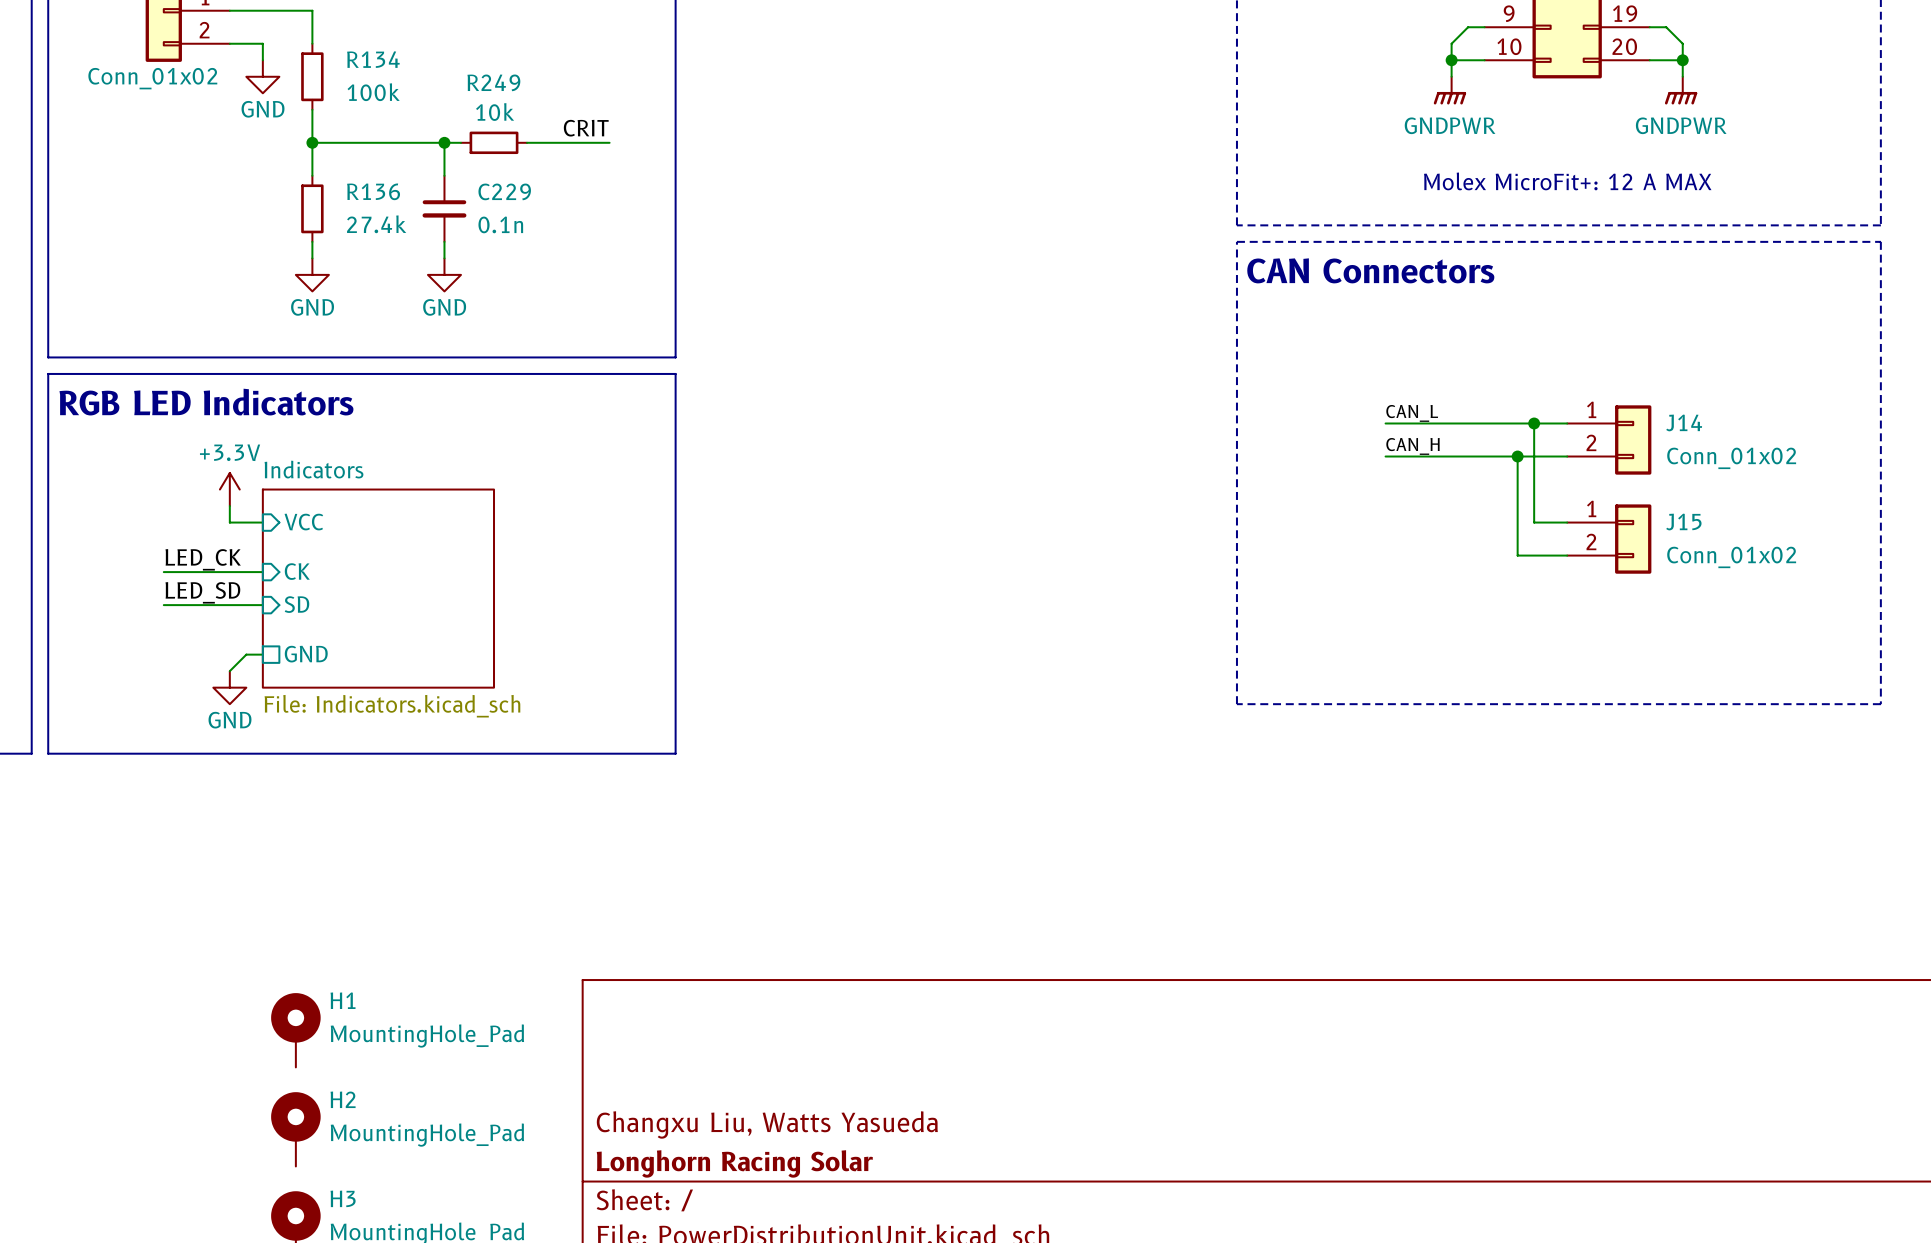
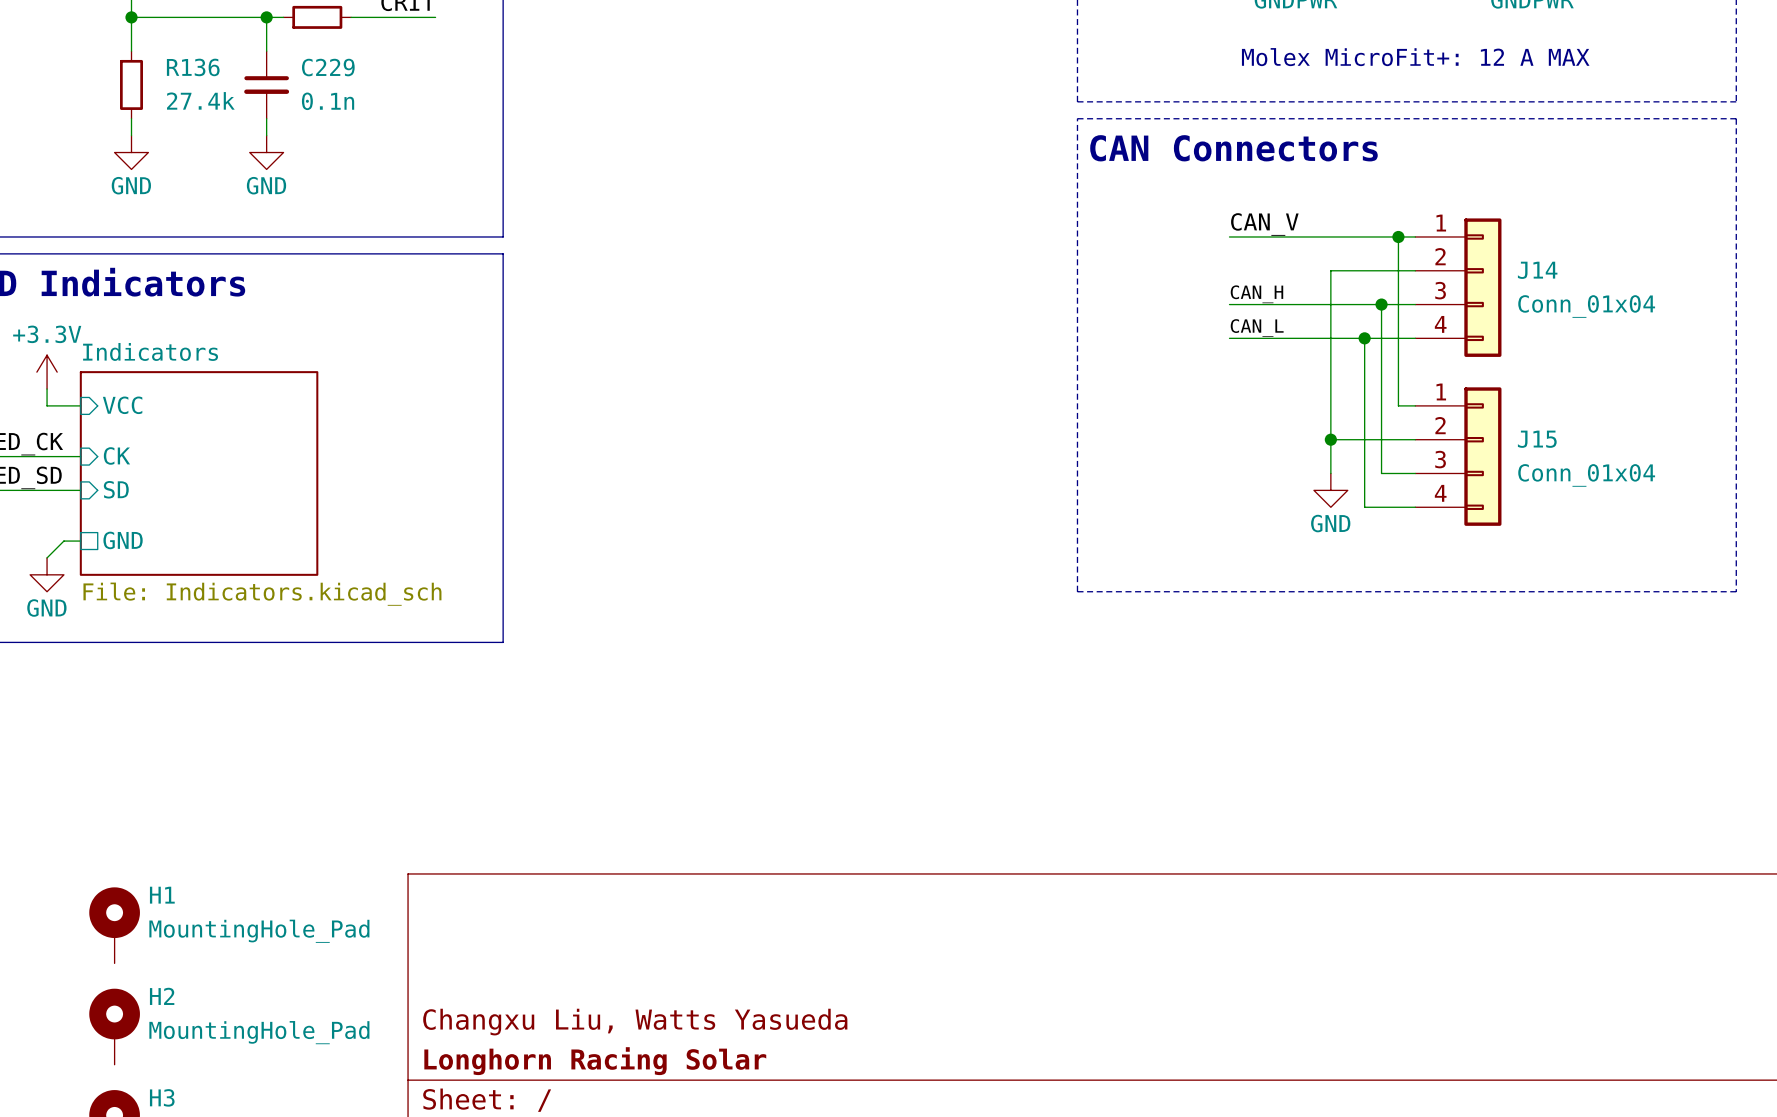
label: none -> CAN_V (1264, 224)
wire: none -> (1229, 236) (1415, 236)
wire: none -> (1398, 236) (1398, 405)
junction: none -> (1398, 236)
wire: none -> (1415, 270) (1330, 270) (1330, 473)
J14 symbol: [1567, 405, 1652, 475] -> [1415, 218, 1502, 357]
label: CAN_L (1412, 413) -> CAN_H (1256, 294)
label: CAN_H (1412, 446) -> CAN_L (1257, 328)
J14 value: Conn_01x02 (1731, 458) -> Conn_01x04 (1586, 306)
J15 symbol: [1567, 504, 1652, 574] -> [1415, 387, 1502, 526]
wire: (1534, 522) (1550, 522) -> (1381, 405) (1381, 473) (1415, 473)
wire: none -> (1330, 439) (1364, 439) (1364, 507) (1415, 507)
junction: none -> (1330, 439)
J15 value: Conn_01x02 (1731, 557) -> Conn_01x04 (1586, 475)
power symbol: none -> GND (1330, 490)

